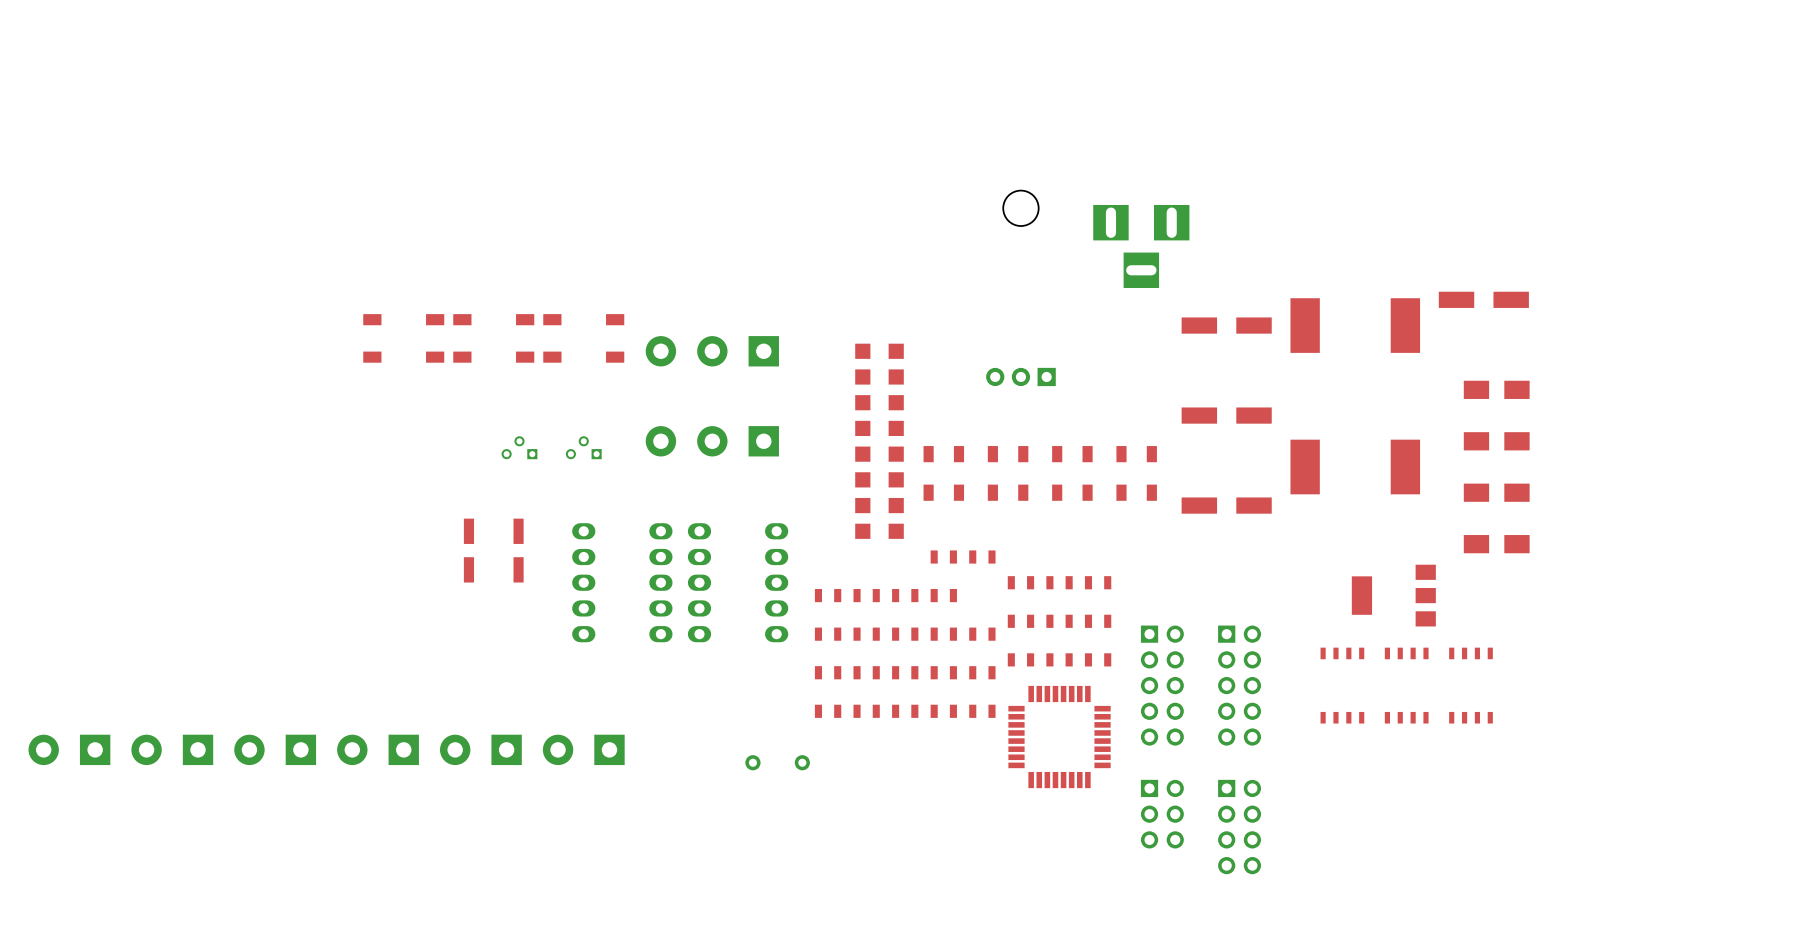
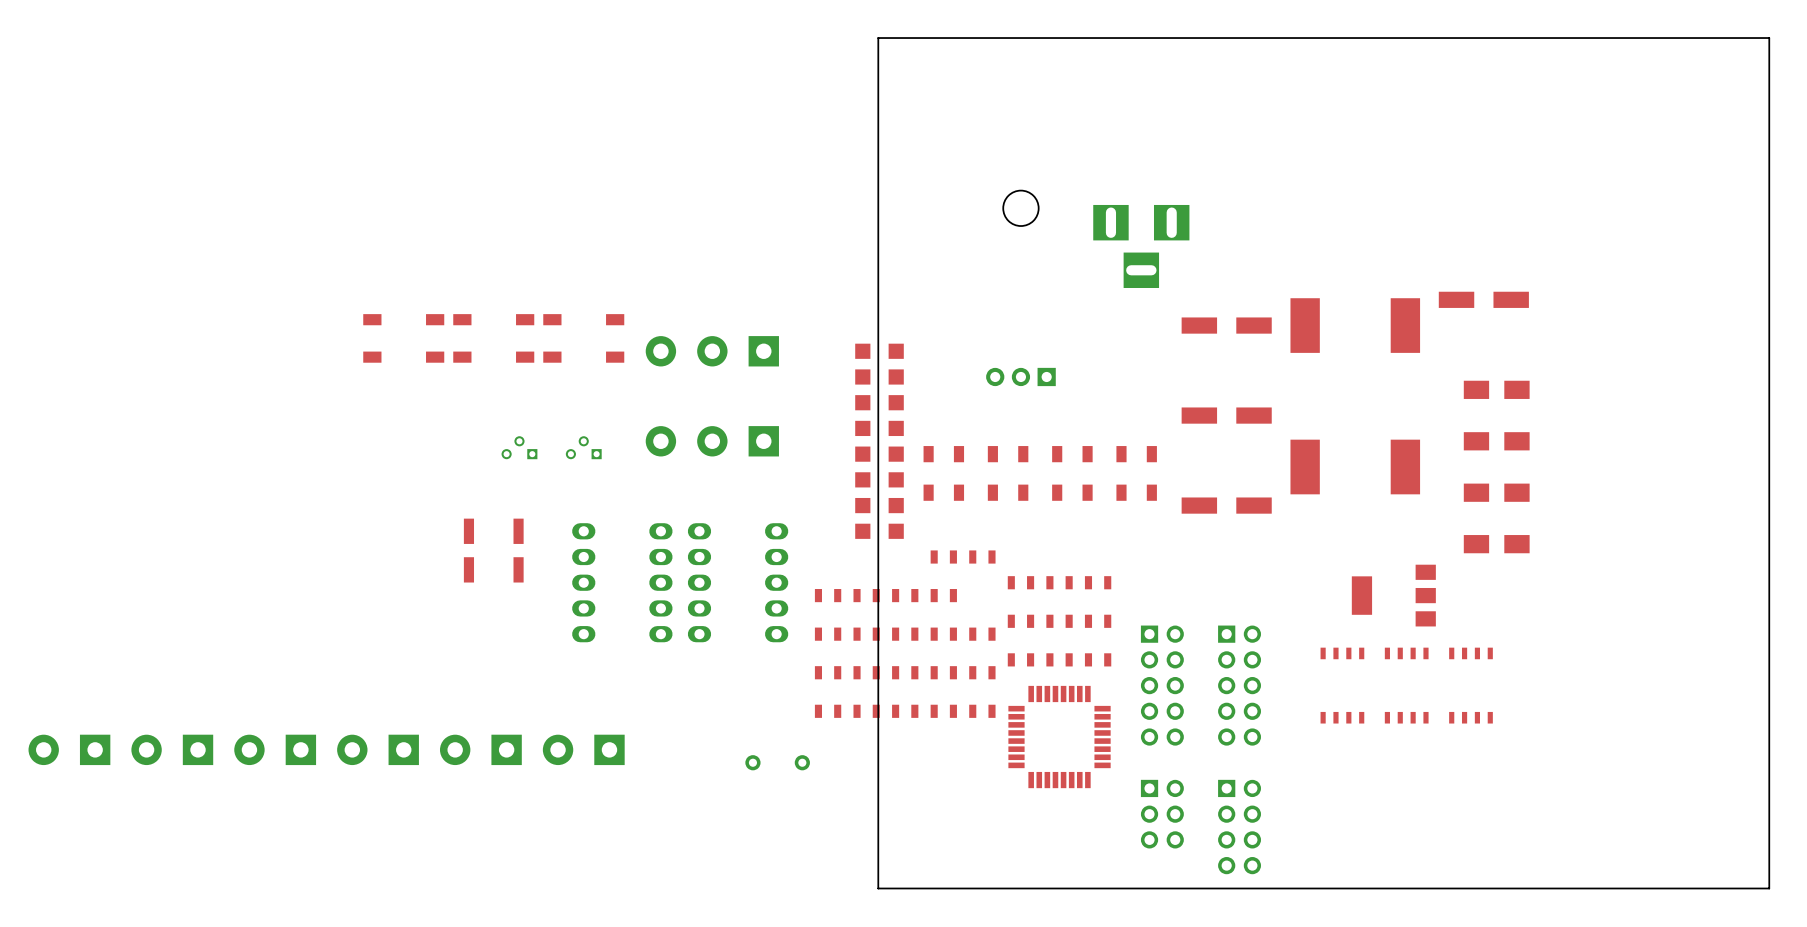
board edge: none -> (1769, 38) (1769, 888) (878, 888) (878, 38) (1769, 38)

